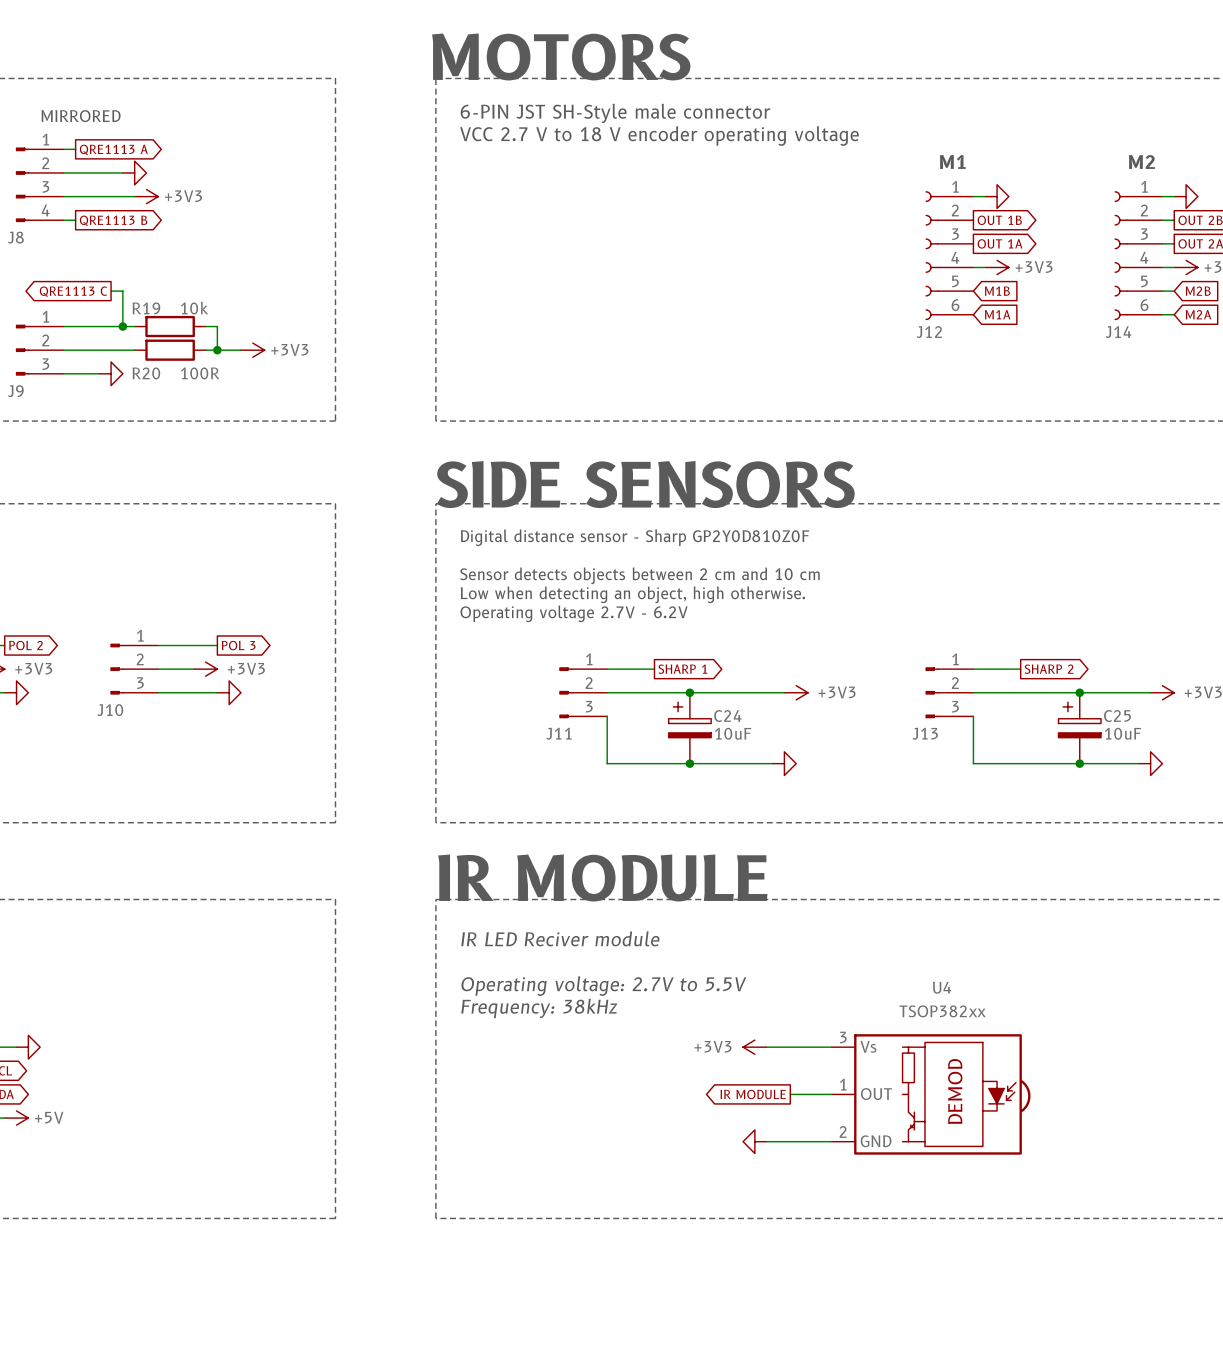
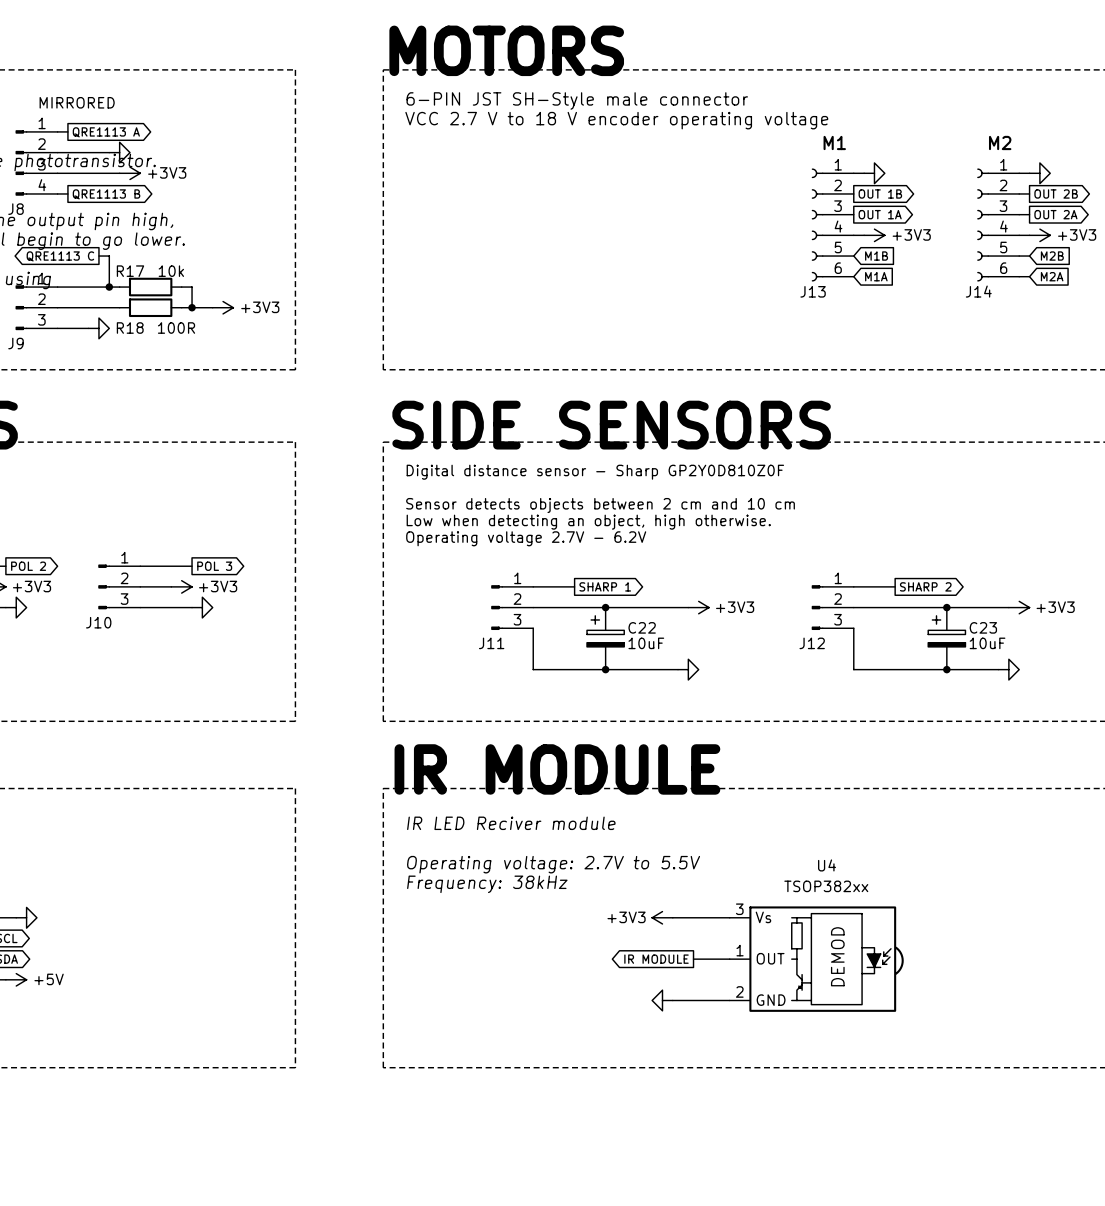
R19 name: R19 (146, 308) -> R17 (130, 271)
J12 name: J12 (929, 332) -> J13 (813, 291)
R20 name: R20 (146, 373) -> R18 (130, 328)
C24 name: C24 (727, 716) -> C22 (642, 627)
C25 name: C25 (1117, 716) -> C23 (983, 627)
J13 name: J13 (925, 733) -> J12 (812, 643)

